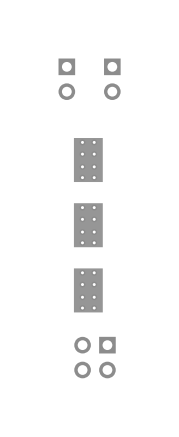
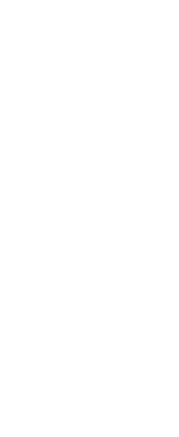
part: (66, 79) -> none
part: (112, 79) -> none
part: (88, 160) -> none
part: (88, 225) -> none
part: (88, 290) -> none
part: (95, 357) -> none

